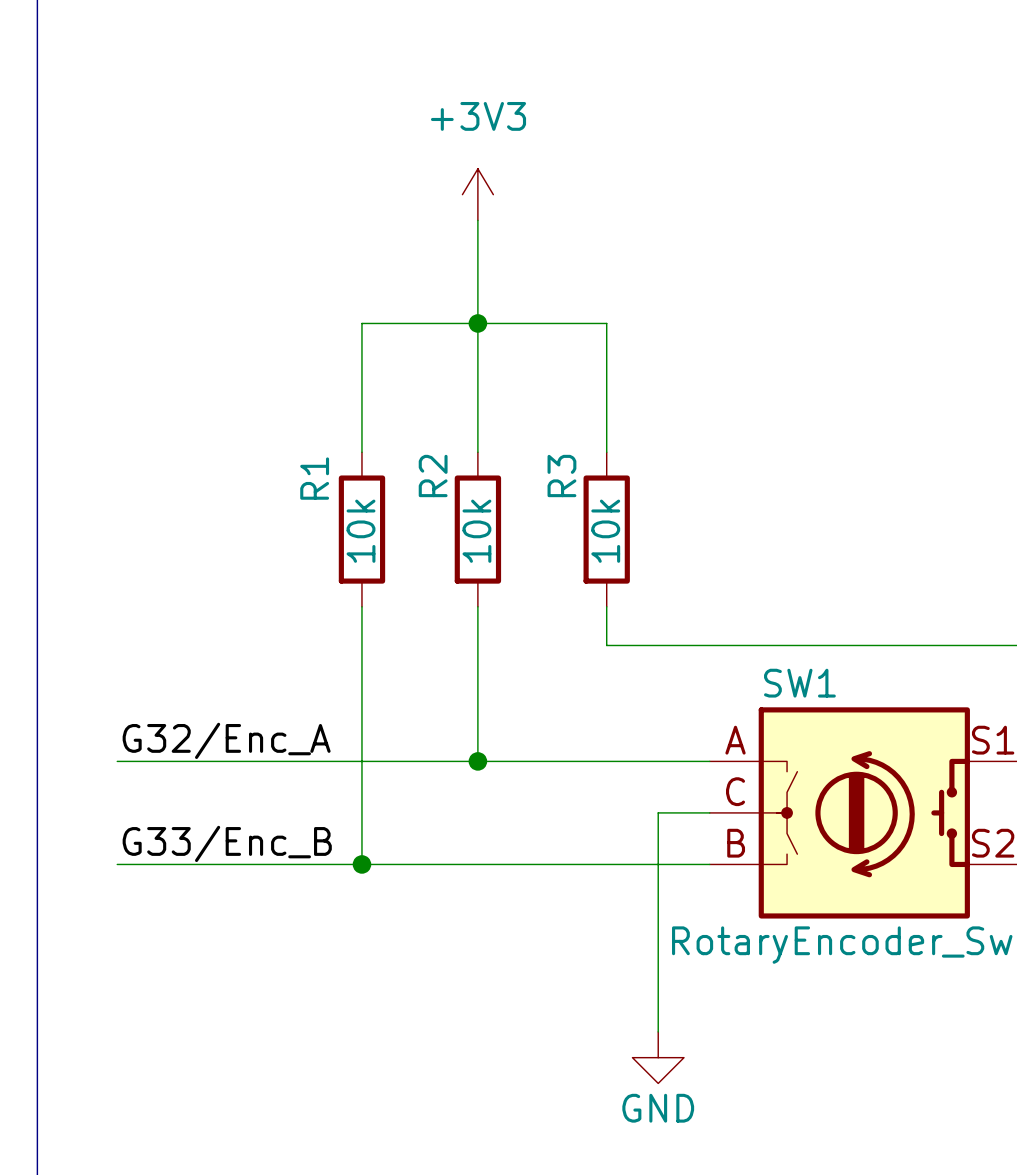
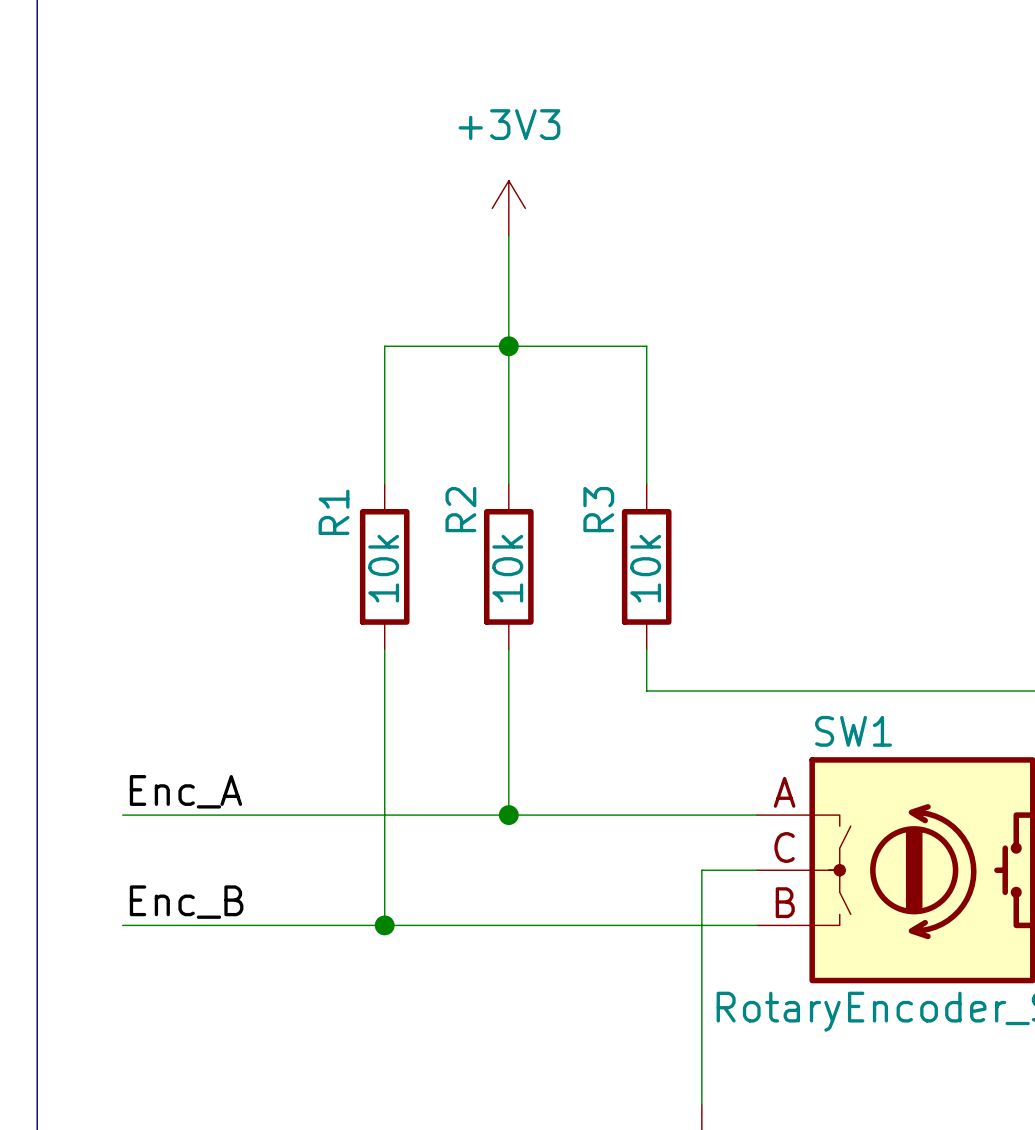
label: G32/Enc_A (226, 740) -> Enc_A (185, 791)
label: G33/Enc_B (227, 843) -> Enc_B (186, 902)

